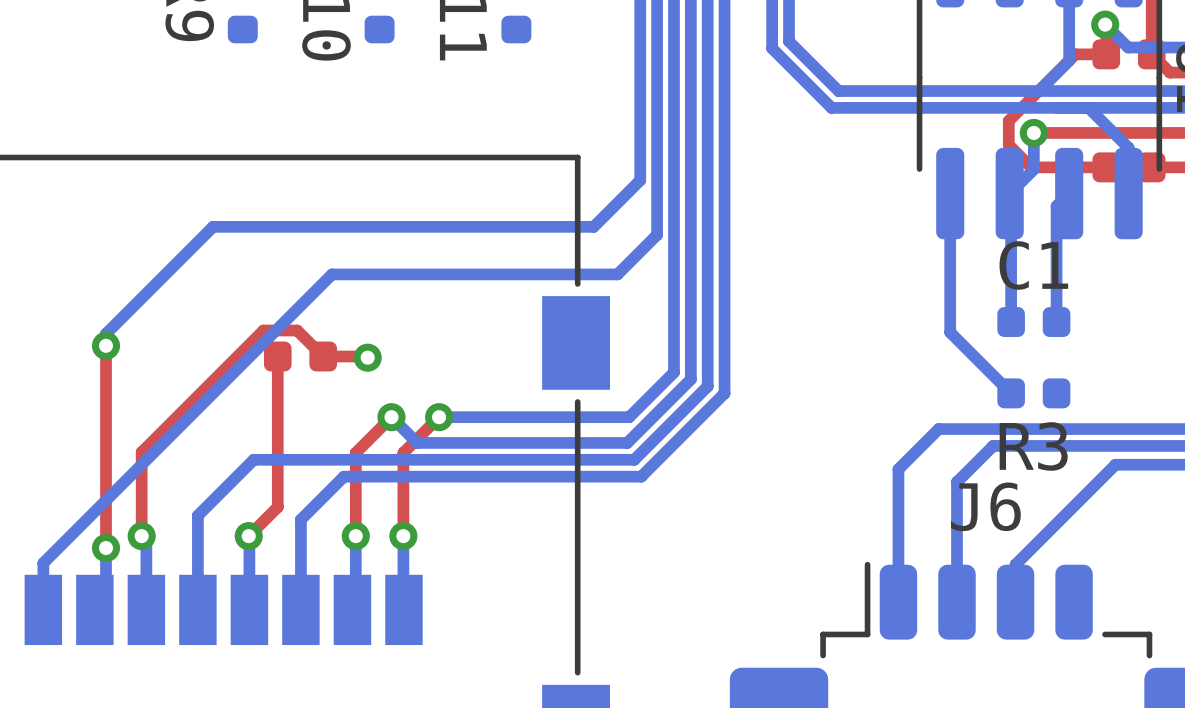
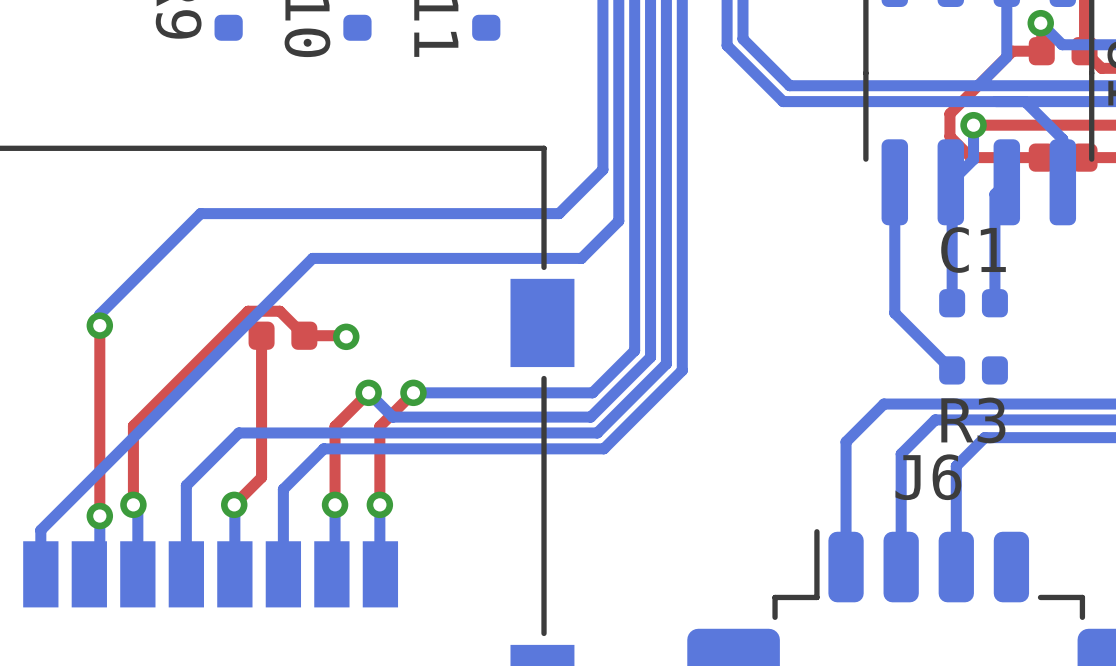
bottom track: (1115, 464) (1015, 564) -> (1050, 437) (984, 437) (956, 466) (956, 531)

